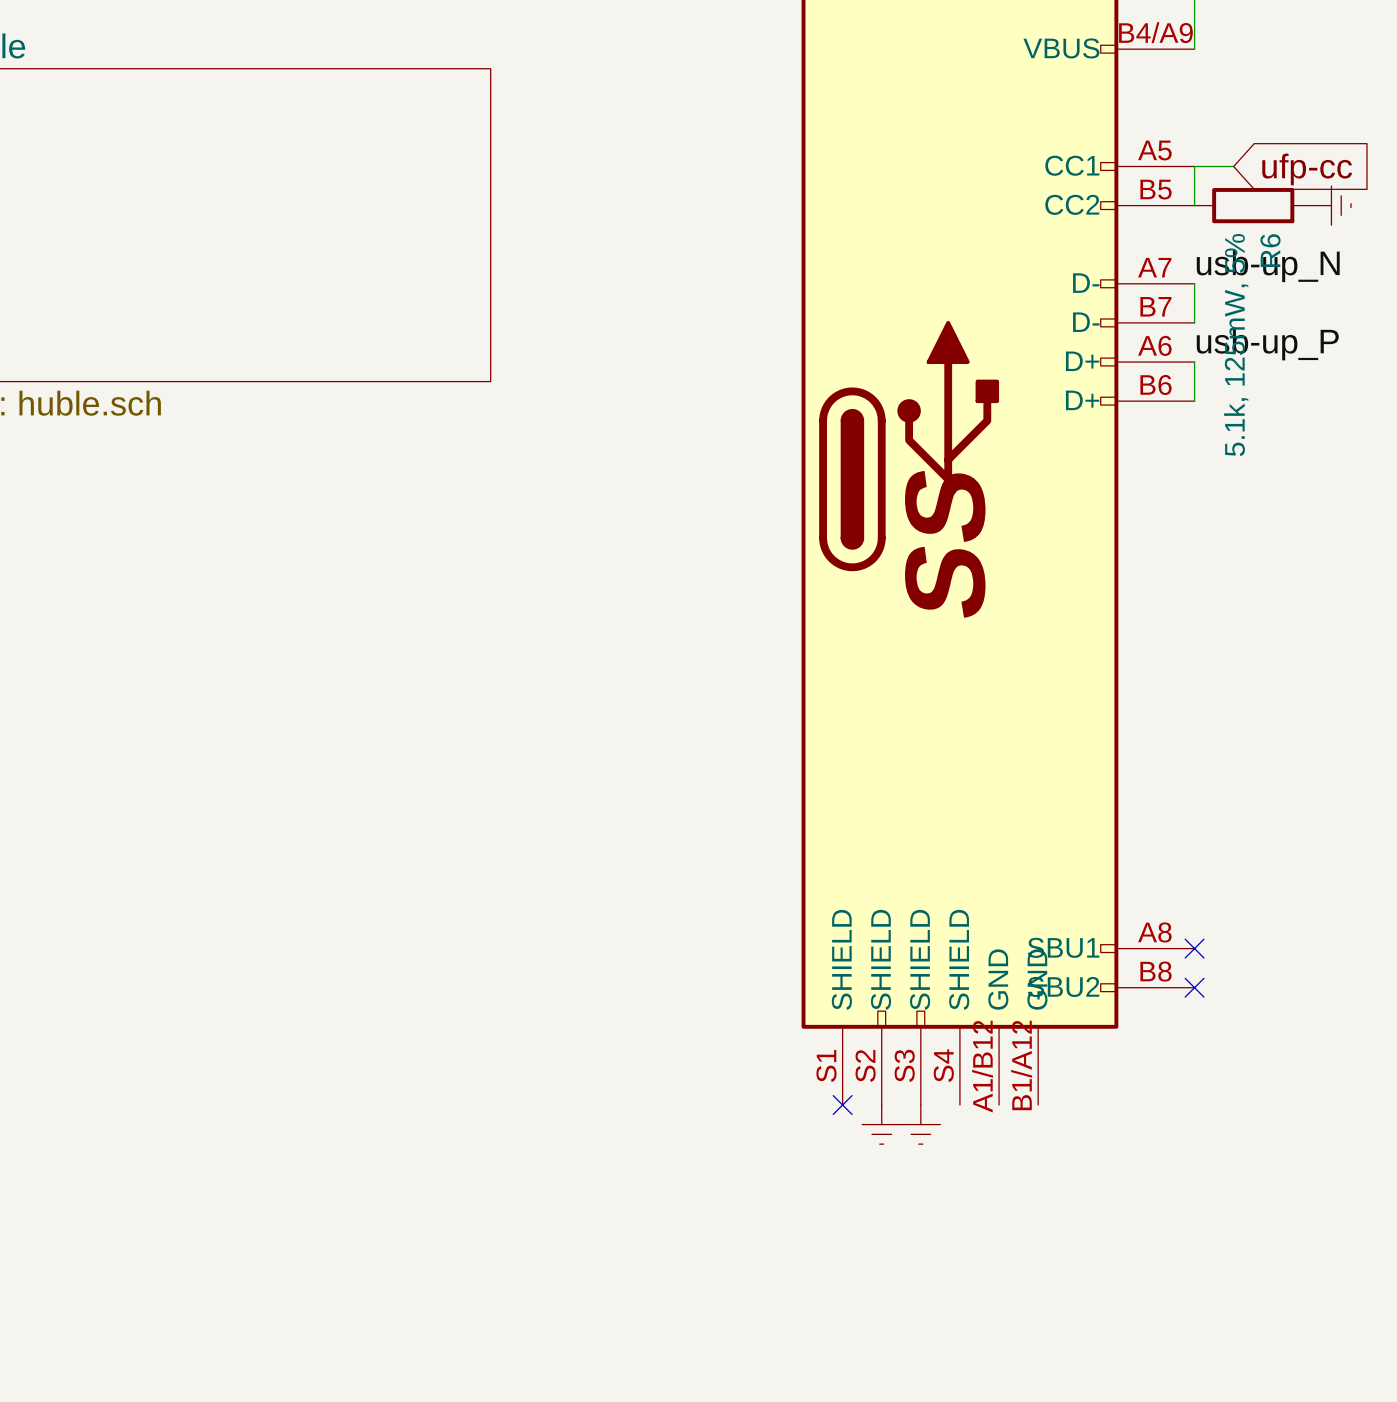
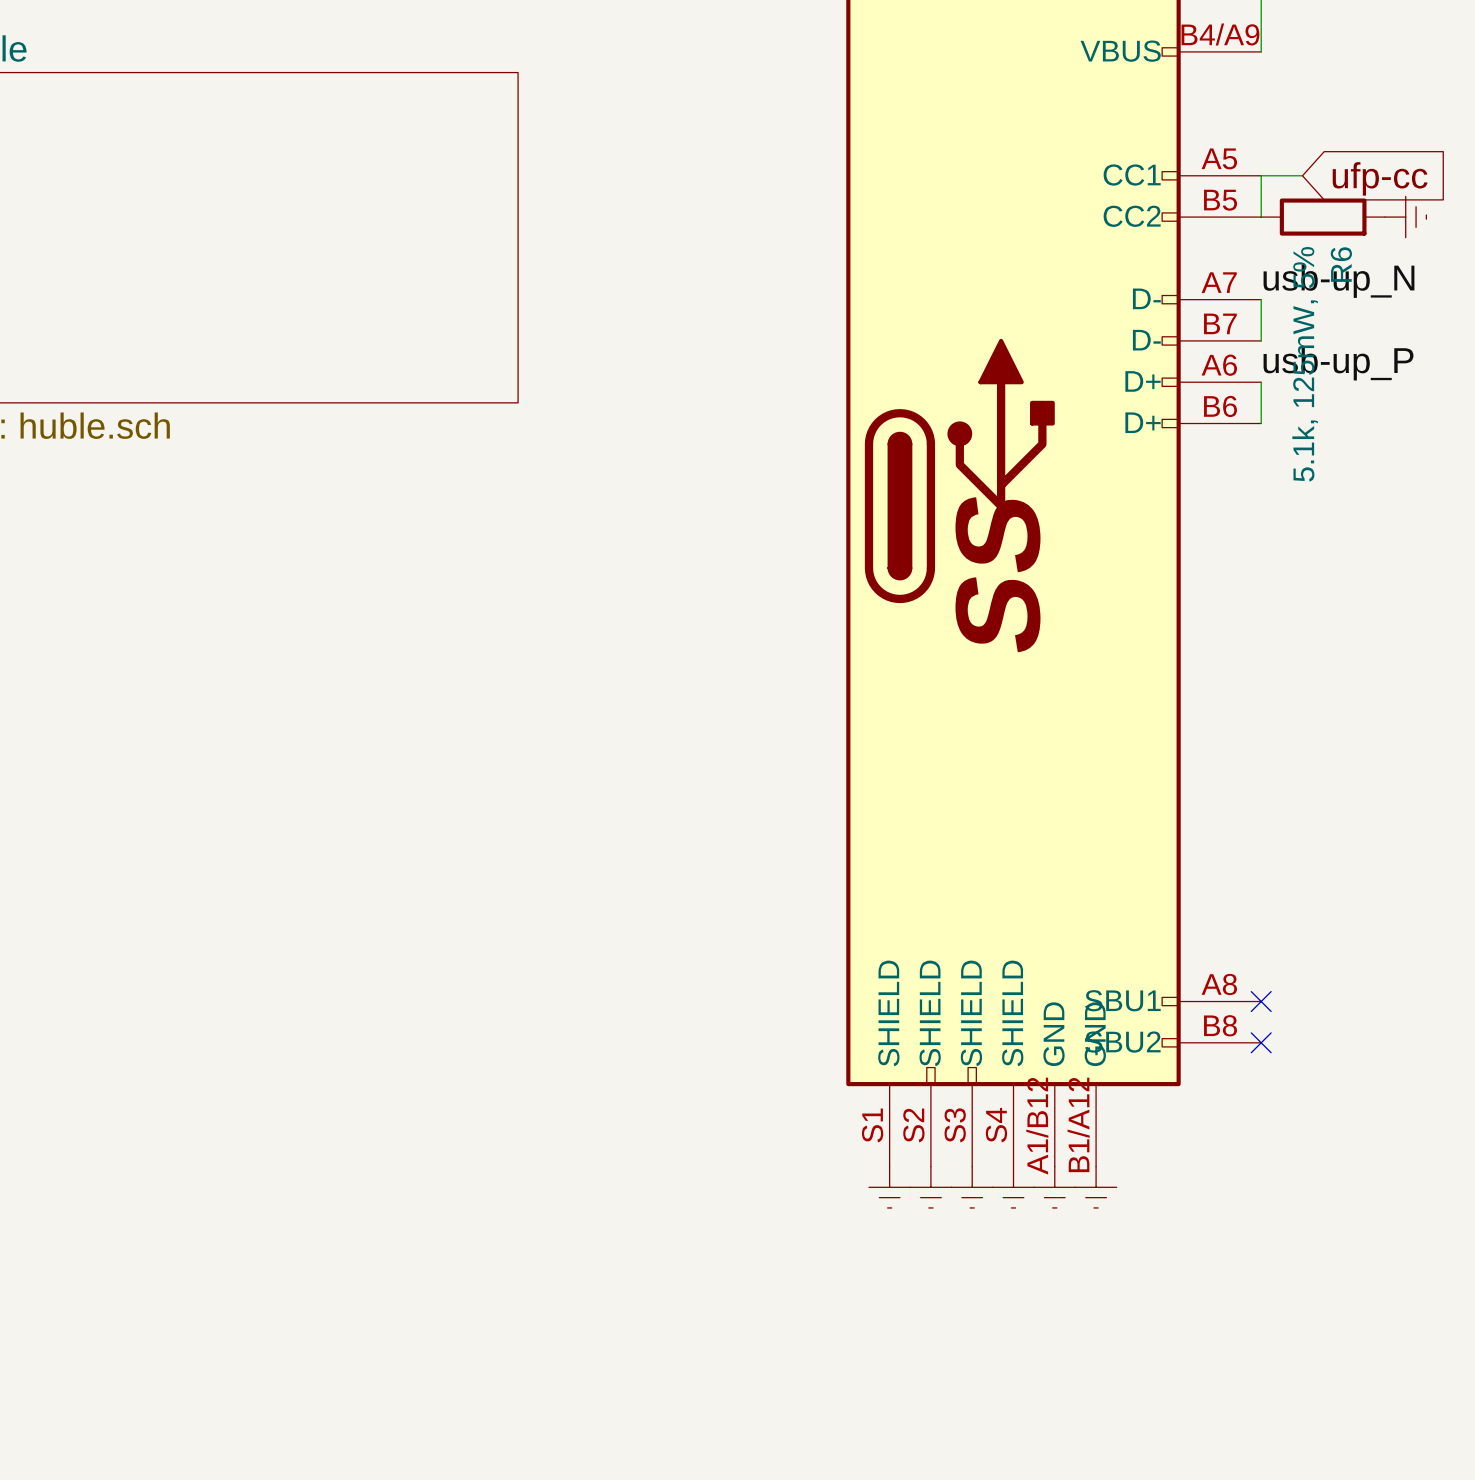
no-connect mark: (842, 1105) -> none
power symbol: none -> (889, 1187)
power symbol: none -> (1013, 1187)
power symbol: none -> (1054, 1187)
power symbol: none -> (1096, 1187)

